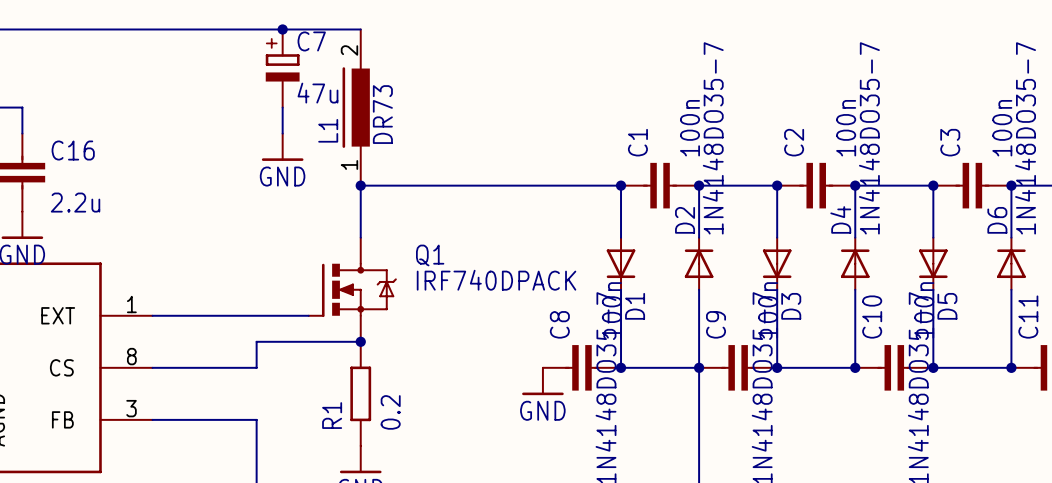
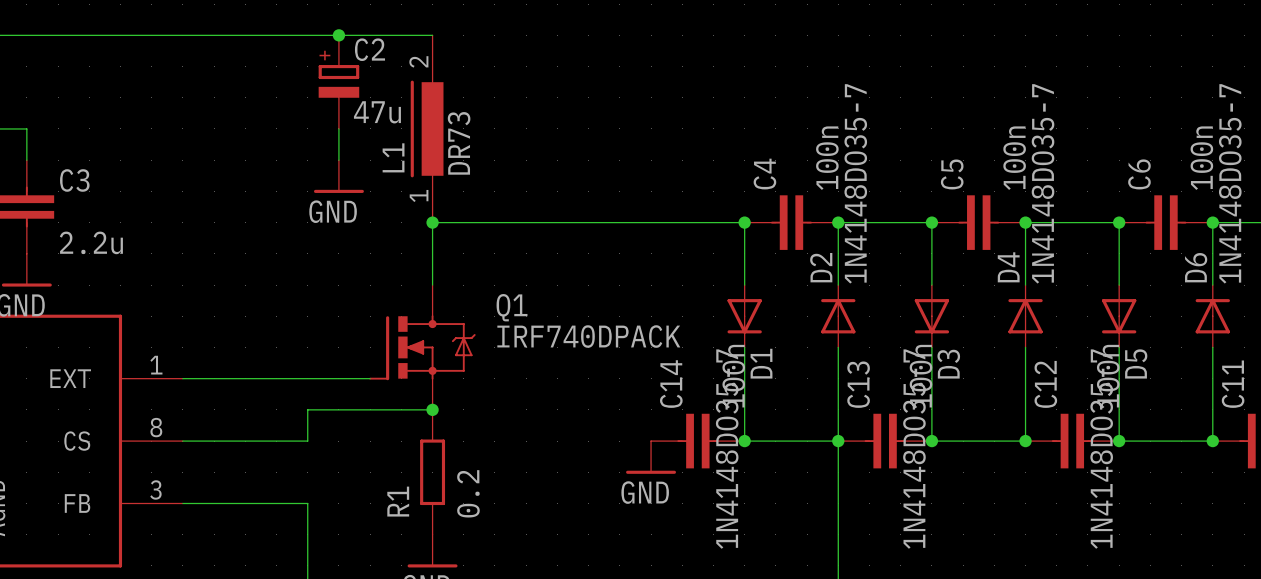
C7 name: C7 (311, 41) -> C2 (369, 49)
C1 name: C1 (637, 142) -> C4 (764, 174)
C2 name: C2 (794, 142) -> C5 (952, 174)
C3 name: C3 (950, 142) -> C6 (1139, 174)
C16 name: C16 (73, 150) -> C3 (74, 180)
C10 name: C10 (872, 317) -> C12 (1045, 384)
C8 name: C8 (559, 324) -> C14 (671, 384)
C9 name: C9 (716, 324) -> C13 (858, 384)

